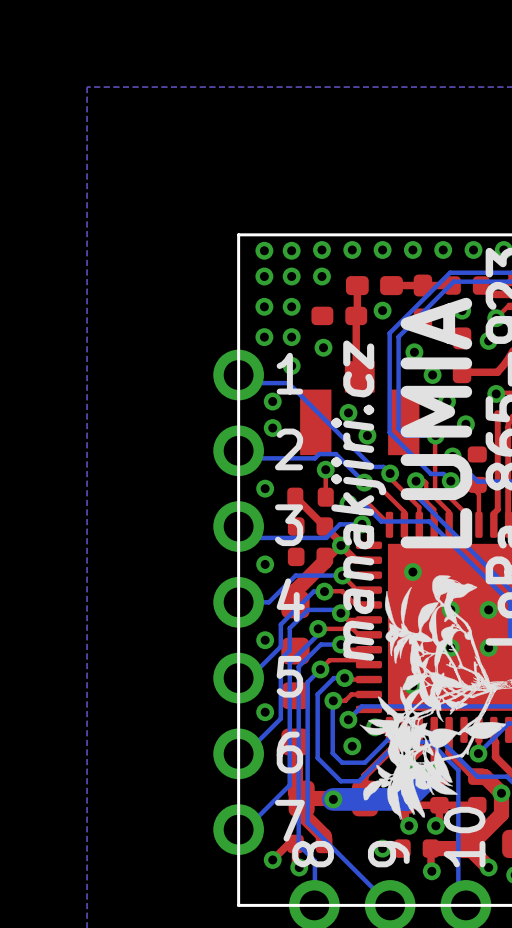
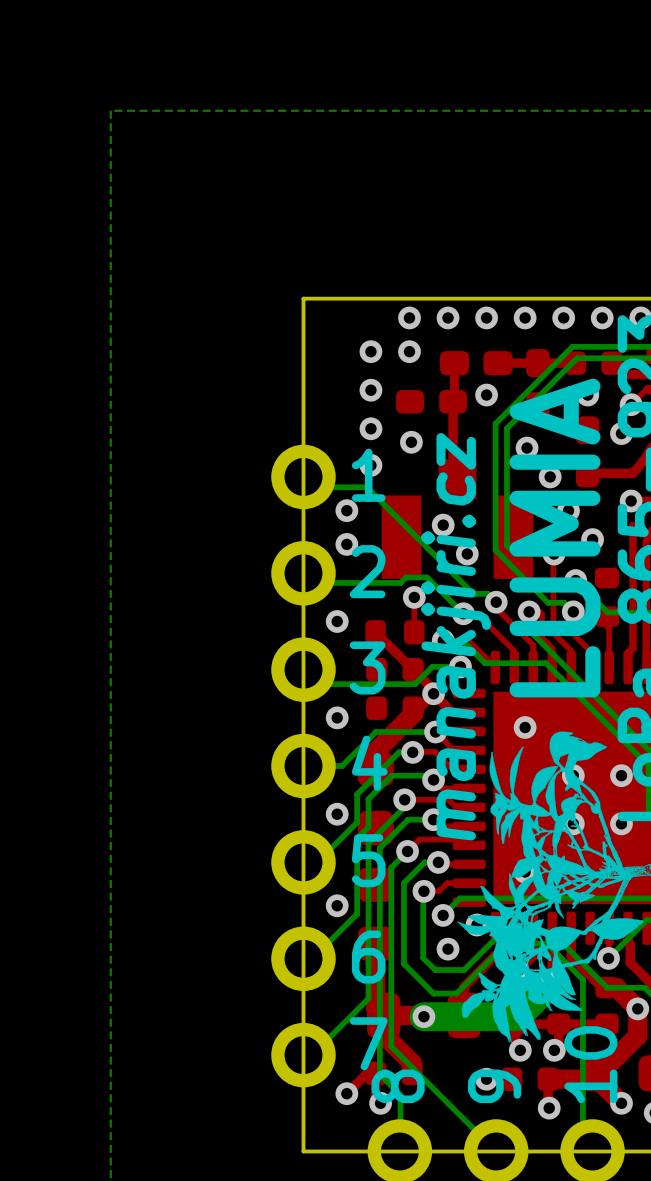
via: (264, 250) -> none
via: (291, 250) -> none
via: (264, 276) -> none
via: (264, 306) -> none
via: (264, 337) -> none

